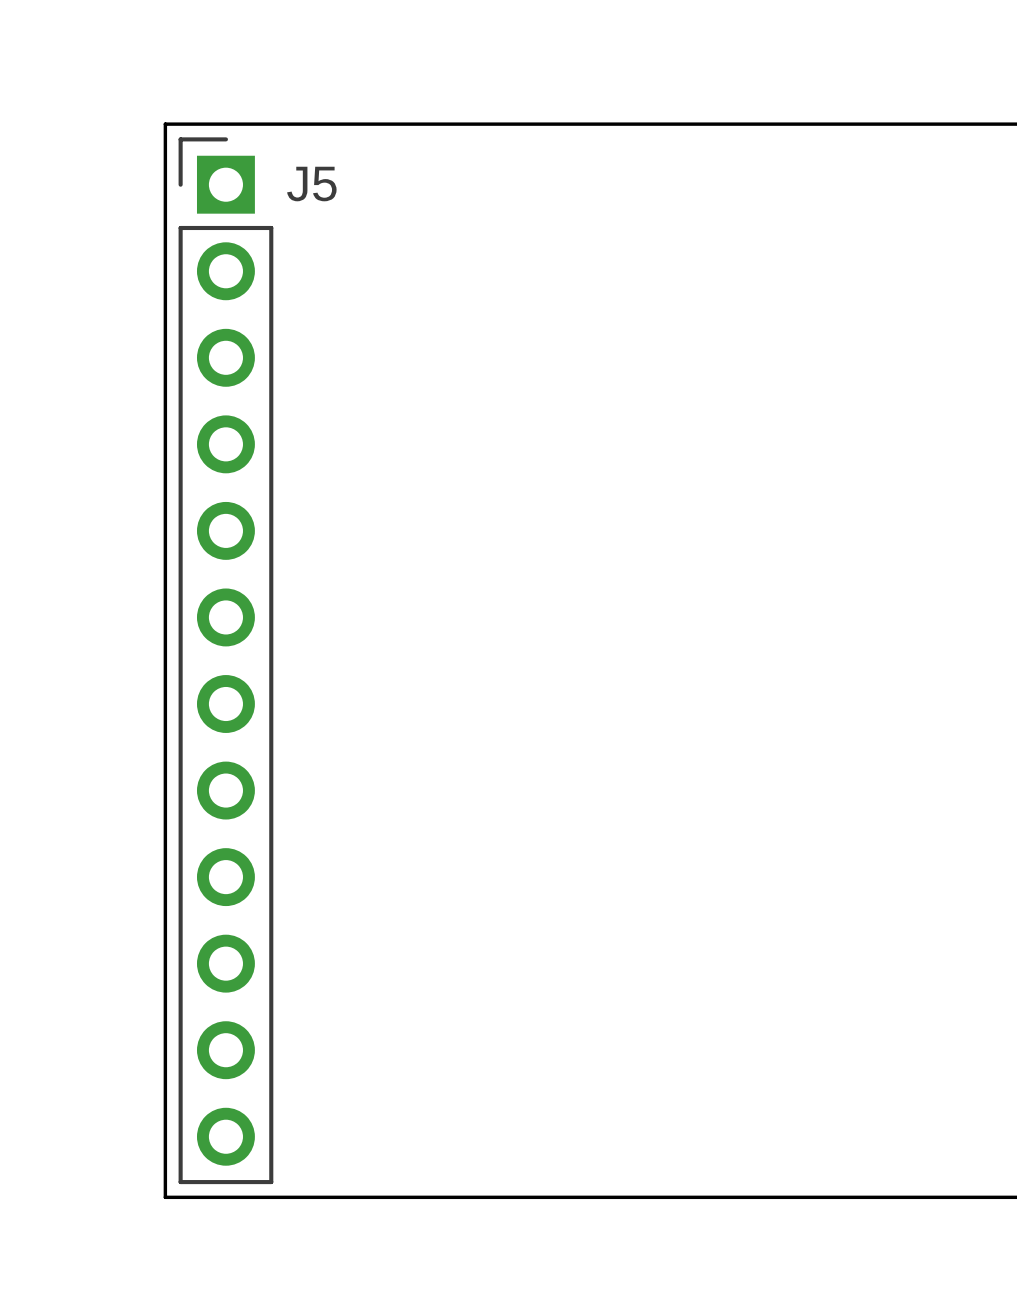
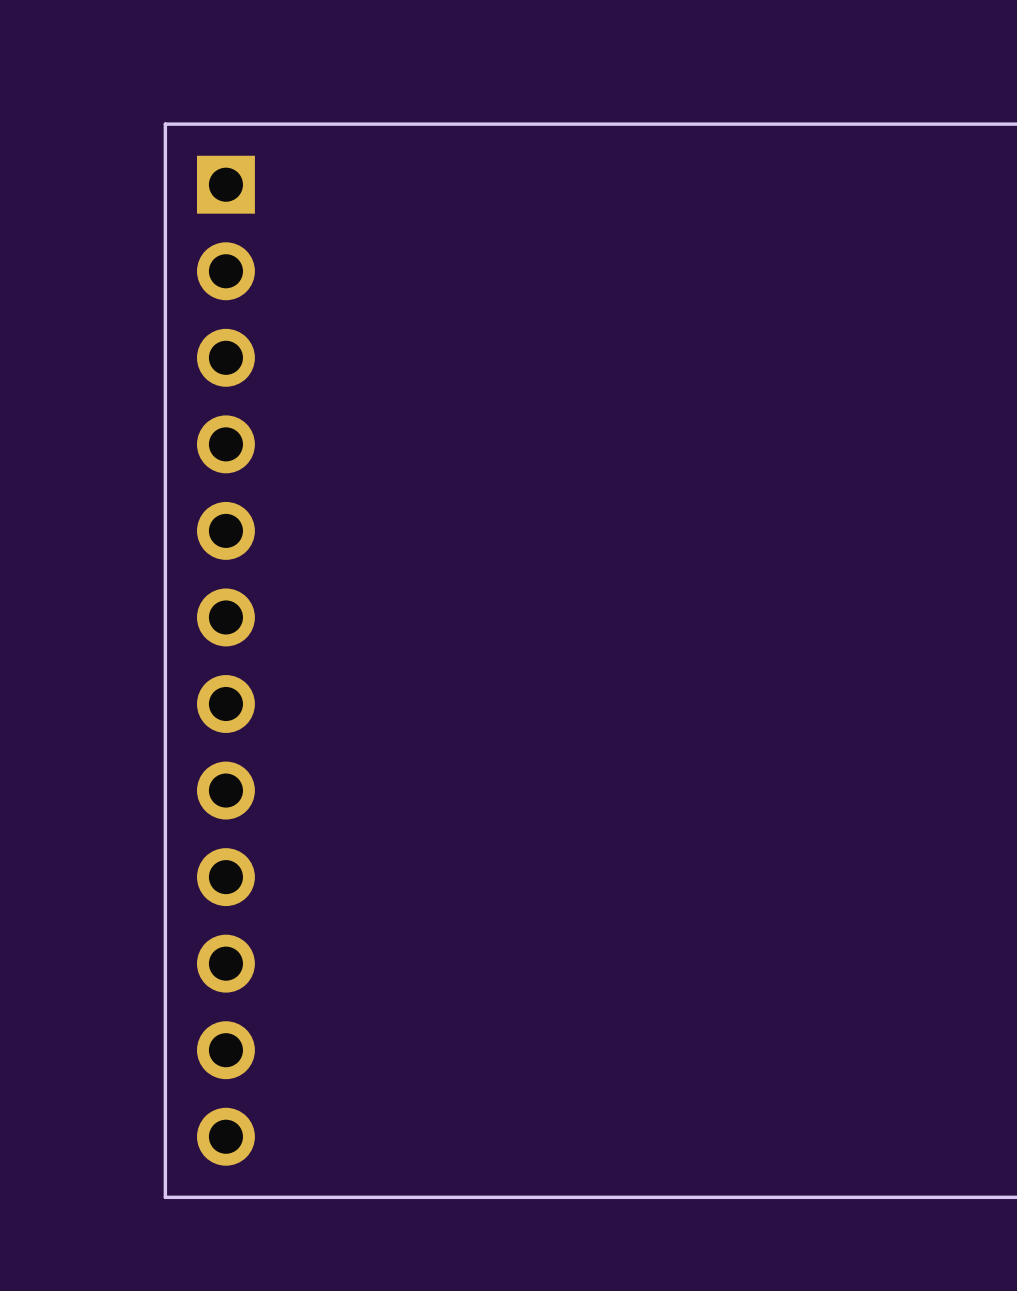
J5 side: bottom (225, 660) -> top (225, 660)

